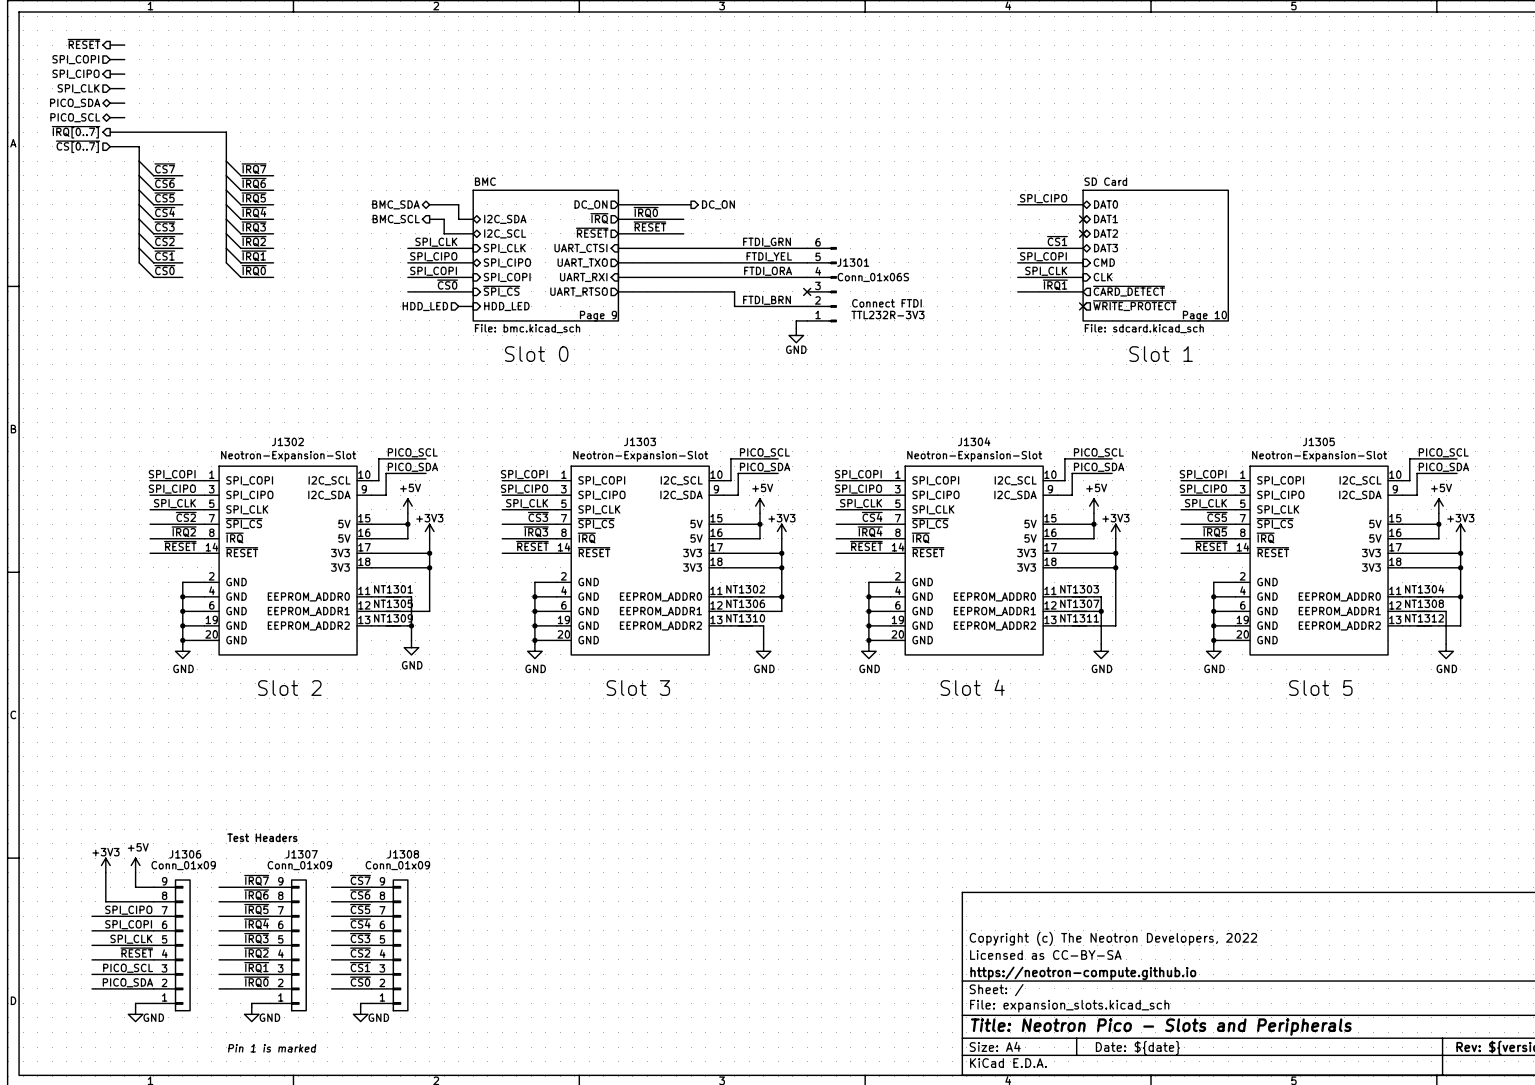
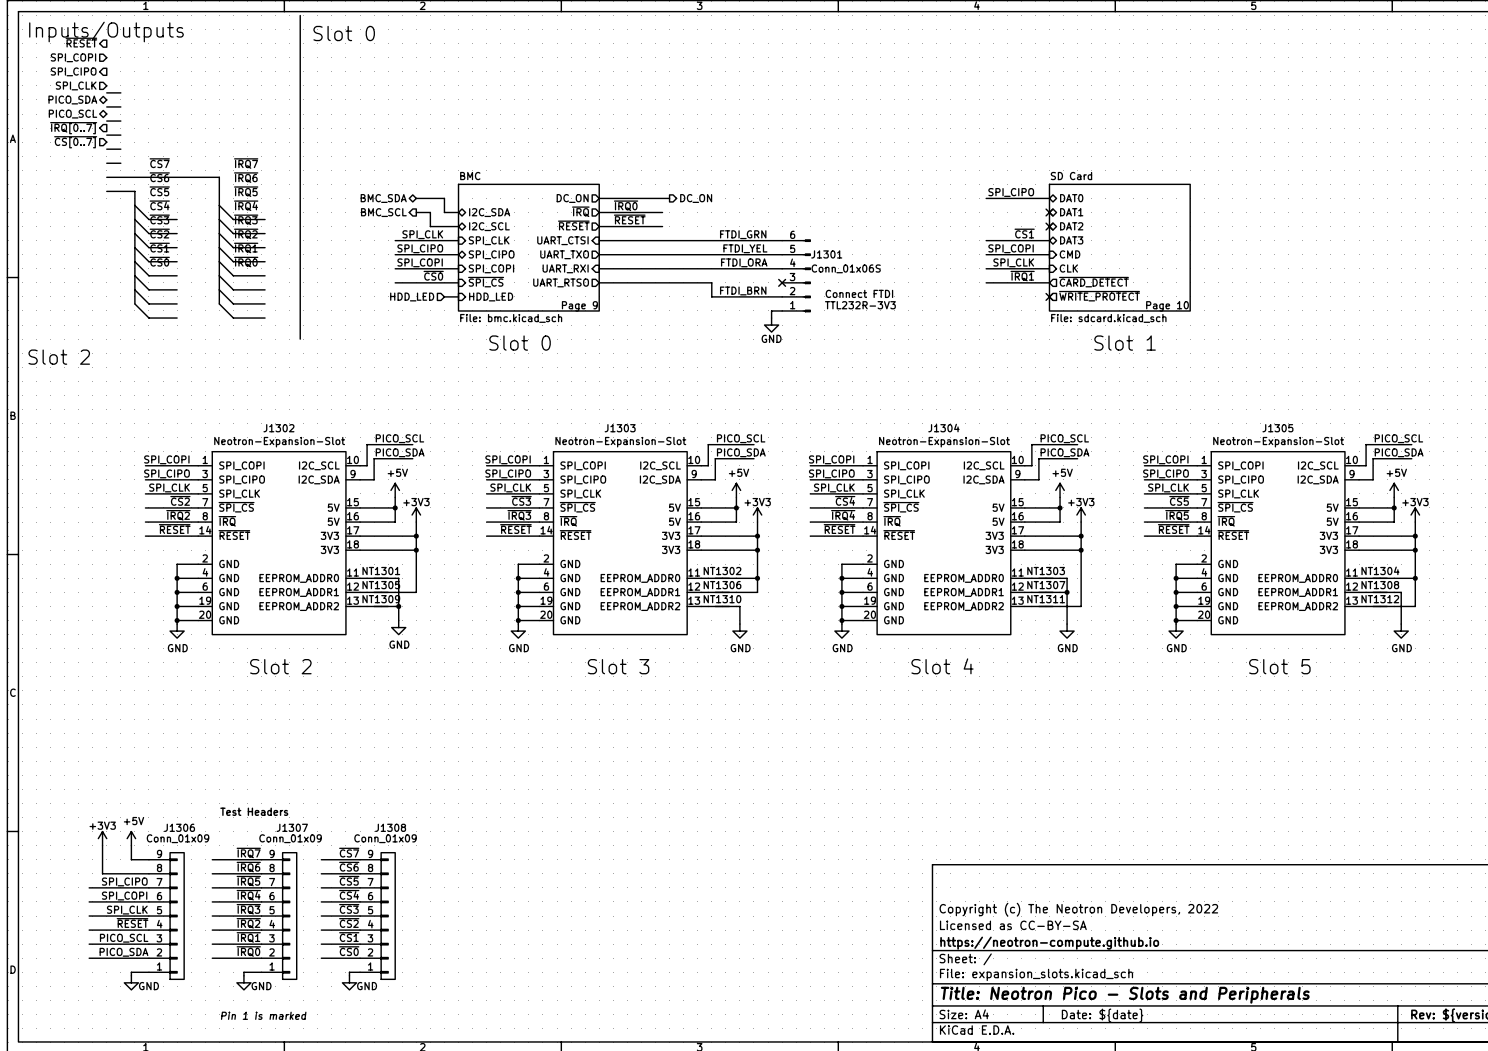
line: none -> (300, 15) (300, 339)
text: none -> Inputs/Outputs (106, 32)
text: none -> Slot 0 (344, 33)
wire: (110, 45) (124, 45) -> (106, 92) (120, 92)
wire: (110, 59) (124, 59) -> (106, 106) (120, 106)
wire: (110, 74) (124, 74) -> (106, 121) (120, 121)
wire: (110, 88) (124, 88) -> (106, 135) (120, 135)
wire: (110, 103) (124, 103) -> (106, 149) (120, 149)
wire: (110, 117) (124, 117) -> (106, 163) (120, 163)
bus: (110, 132) (226, 132) (226, 183) -> (106, 177) (219, 177)
bus: (110, 146) (139, 146) (139, 197) -> (106, 191) (134, 191)
wire: (139, 161) (153, 175) (182, 175) -> (134, 205) (148, 219) (177, 219)
wire: (226, 161) (240, 175) (273, 175) -> (219, 205) (233, 219) (265, 219)
wire: (139, 175) (153, 190) (182, 190) -> (134, 219) (148, 233) (177, 233)
wire: (226, 175) (240, 190) (273, 190) -> (219, 219) (233, 233) (265, 233)
wire: (139, 190) (153, 204) (182, 204) -> (134, 233) (148, 247) (177, 247)
wire: (226, 190) (240, 204) (273, 204) -> (219, 233) (233, 247) (265, 247)
wire: (139, 204) (153, 219) (182, 219) -> (134, 247) (148, 261) (177, 261)
wire: (226, 204) (240, 219) (273, 219) -> (219, 247) (233, 261) (265, 261)
wire: (139, 219) (153, 233) (182, 233) -> (134, 261) (148, 275) (177, 275)
wire: (226, 219) (240, 233) (273, 233) -> (219, 261) (233, 275) (265, 275)
wire: (139, 233) (153, 248) (182, 248) -> (134, 275) (148, 289) (177, 289)
wire: (226, 233) (240, 248) (273, 248) -> (219, 275) (233, 289) (265, 289)
wire: (139, 248) (153, 262) (182, 262) -> (134, 289) (148, 303) (177, 303)
wire: (226, 248) (240, 262) (273, 262) -> (219, 289) (233, 303) (265, 303)
wire: (139, 262) (153, 277) (182, 277) -> (134, 303) (148, 318) (177, 318)
bus: none -> (134, 254) (134, 303)
wire: (226, 262) (240, 277) (273, 277) -> (219, 303) (233, 318) (265, 318)
bus: none -> (219, 254) (219, 303)
text: none -> Slot 2 (59, 357)

